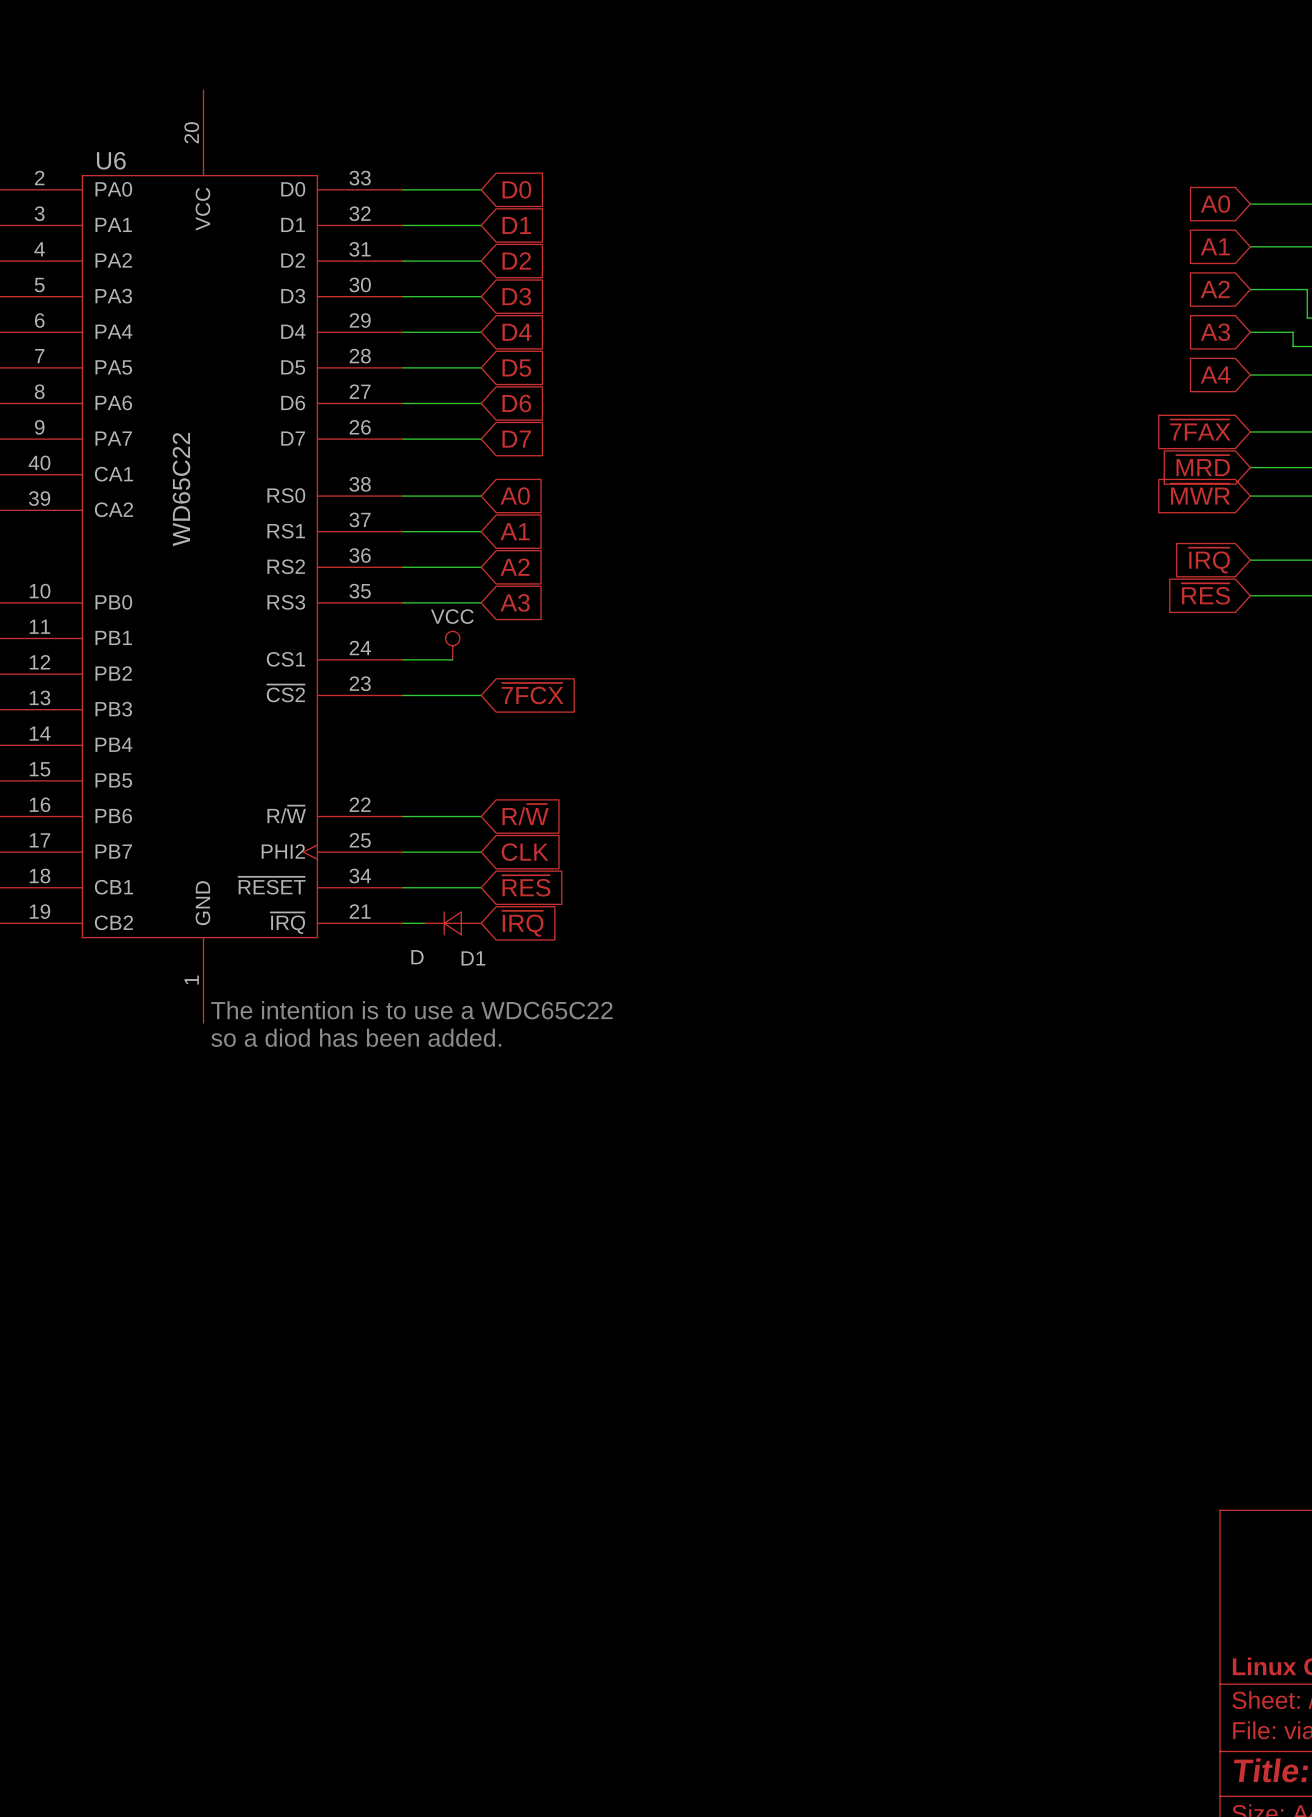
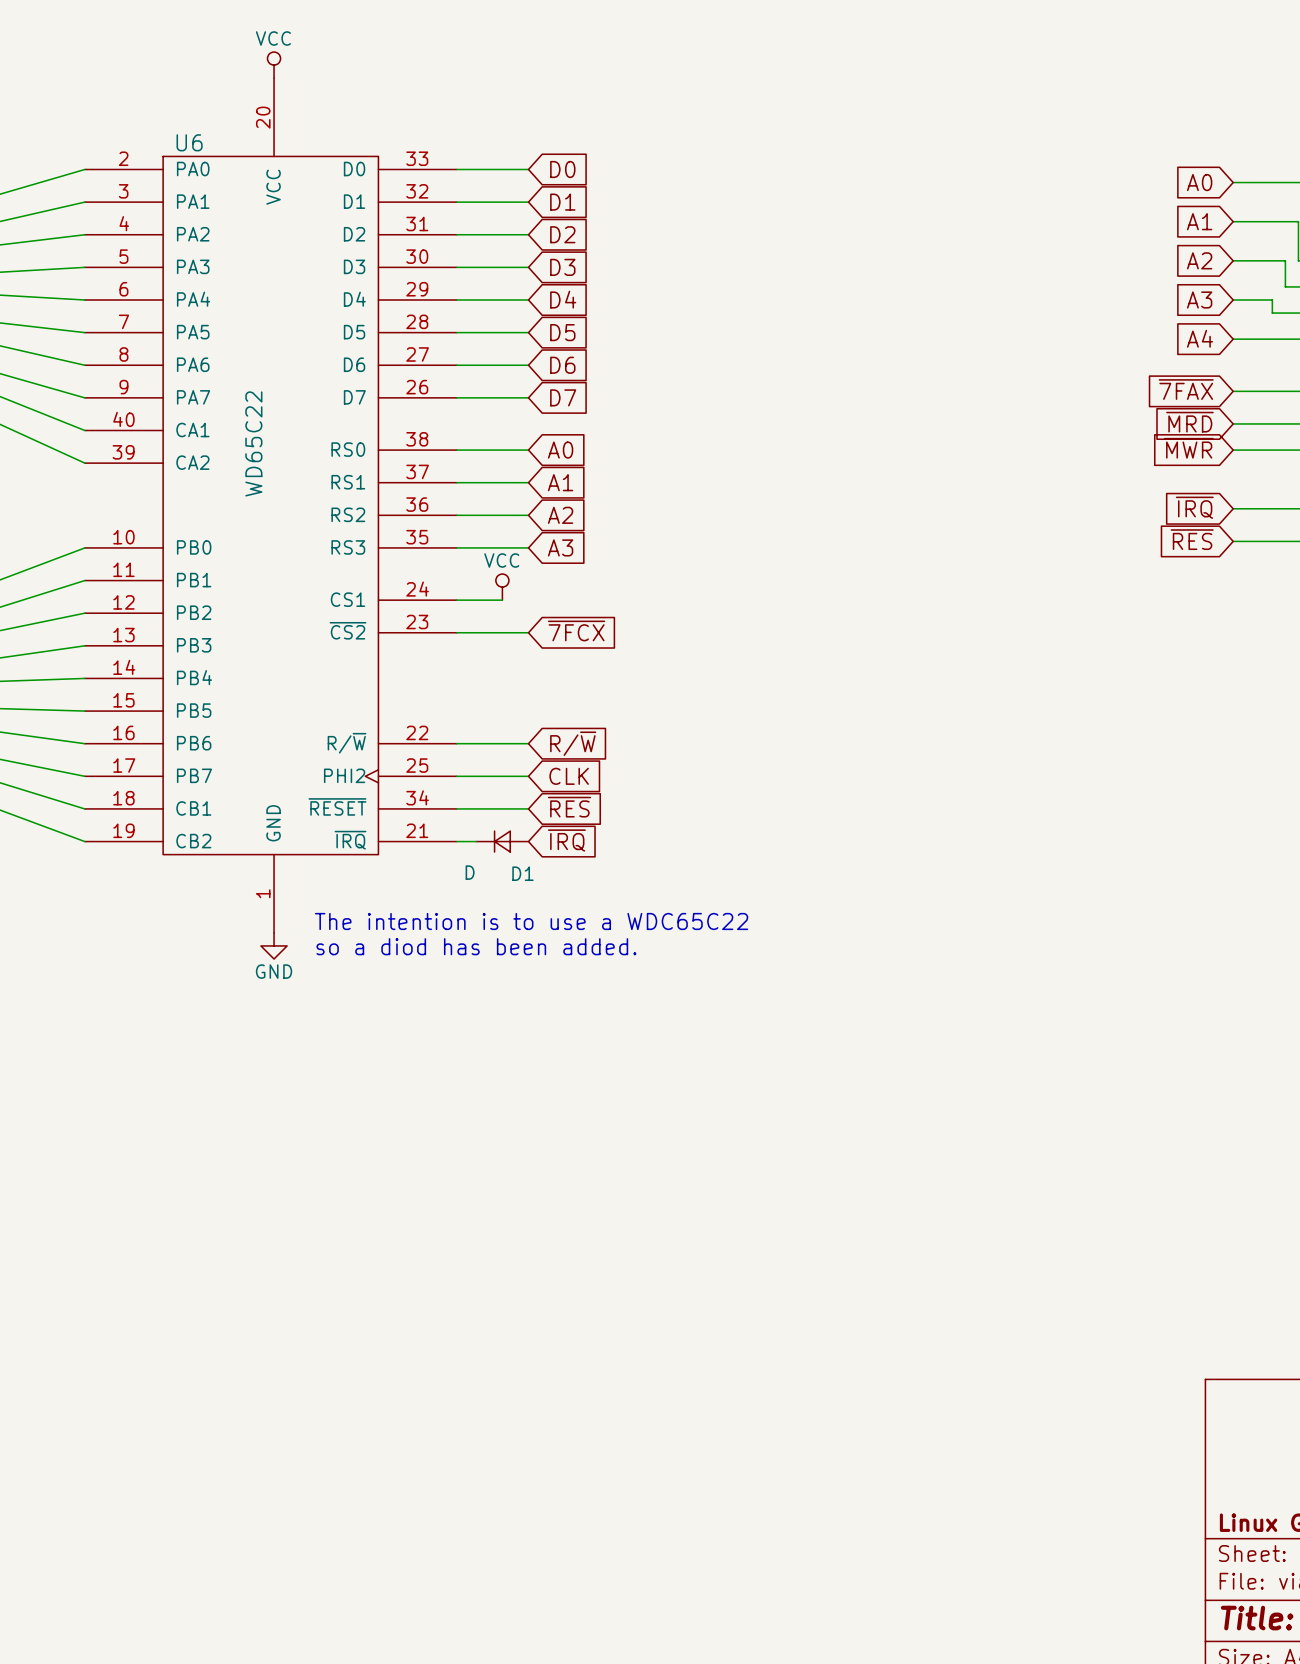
power symbol: none -> VCC (274, 65)
text position: The intention is to use a WDC65C22 (411, 1010) -> The intention is to use a WDC65C22 (531, 921)
power symbol: none -> GND (274, 945)
text position: so a diod has been added. (356, 1037) -> so a diod has been added. (476, 946)

